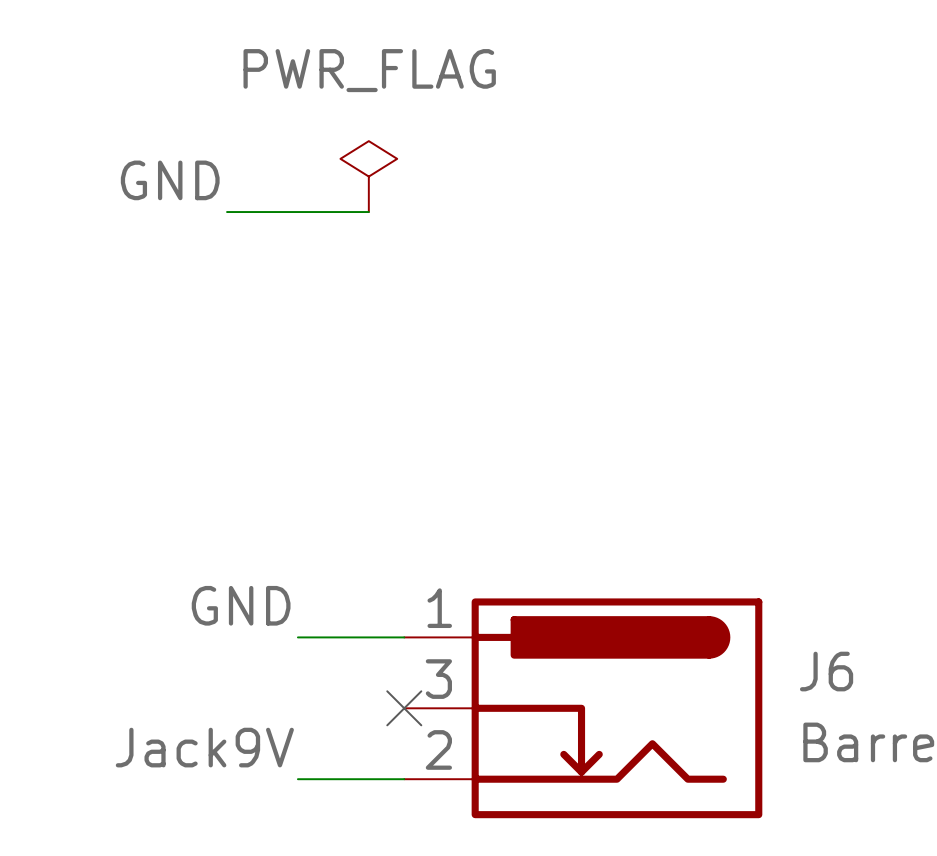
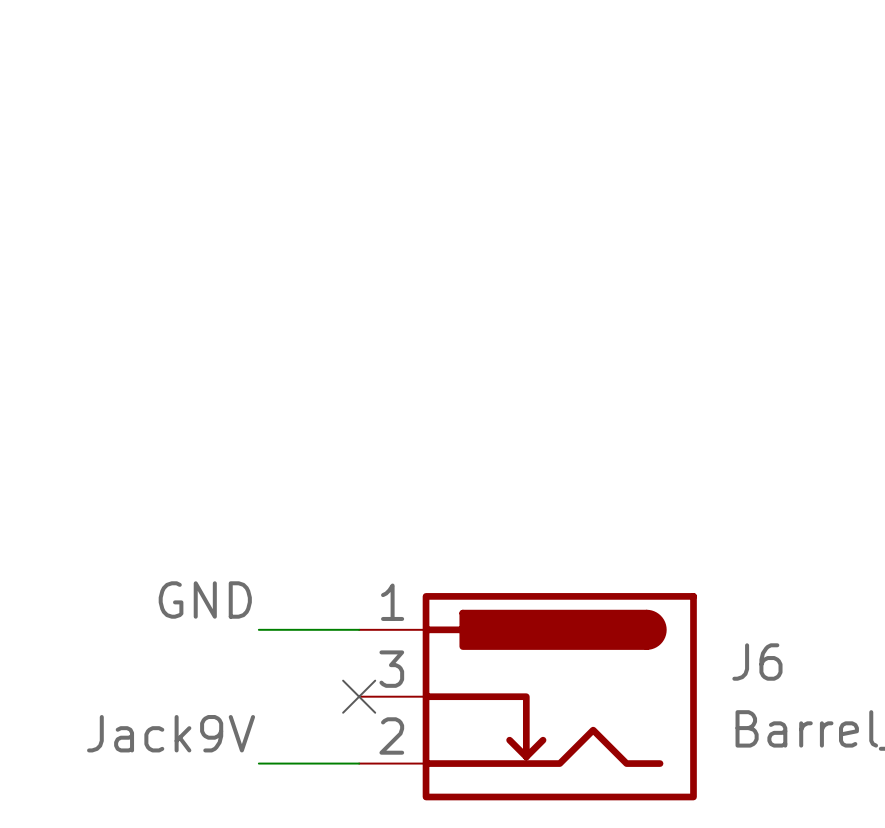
power symbol: PWR_FLAG (368, 176) -> none
label: GND (170, 180) -> none
wire: (227, 212) (368, 212) -> none

